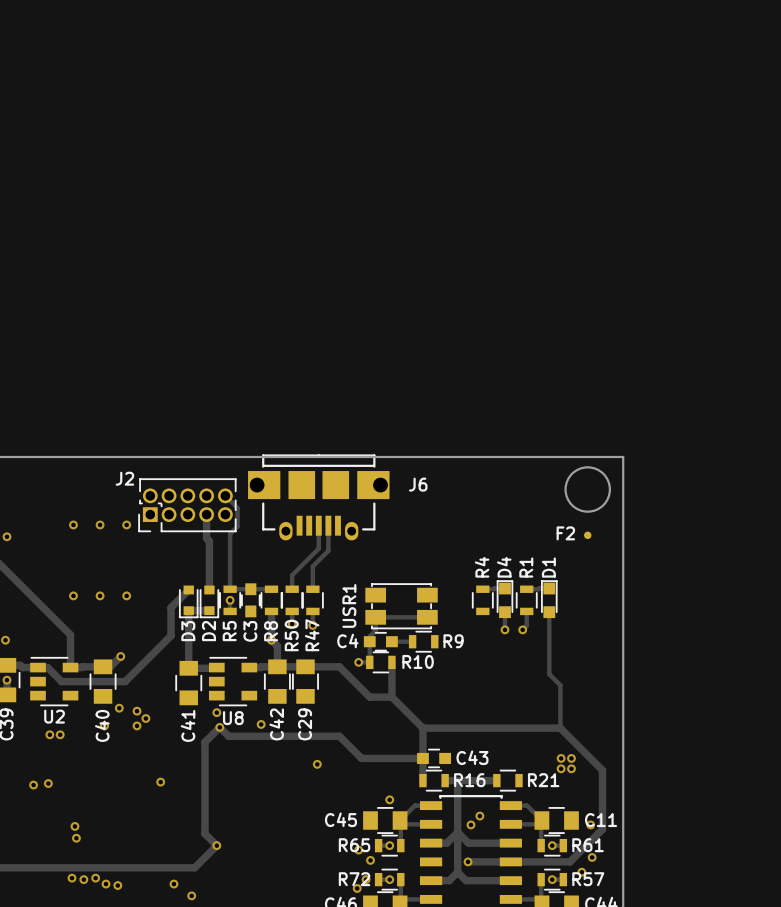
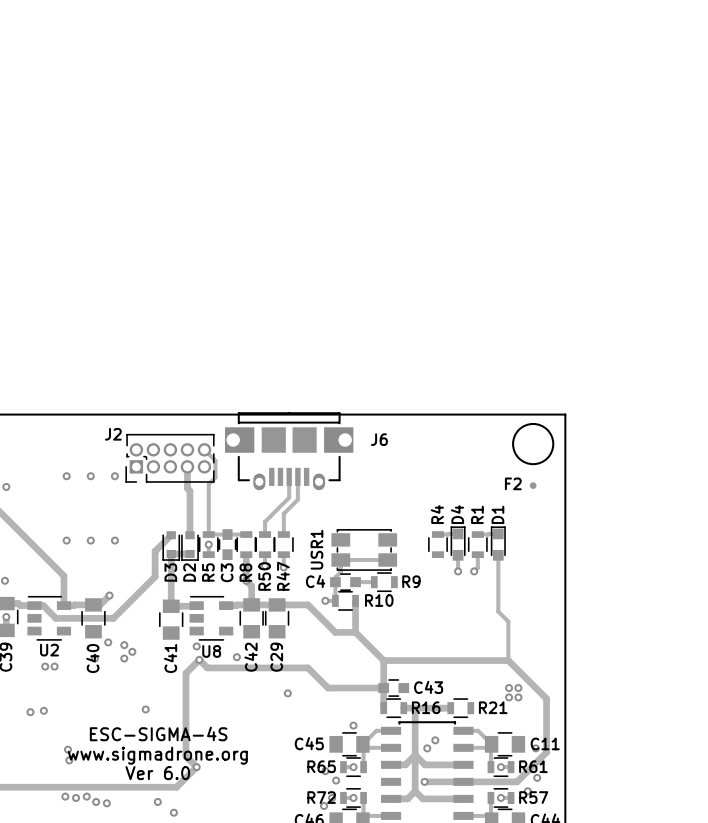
text: none -> ESC-SIGMA-4S (158, 733)
text: none -> www.sigmadrone.org (157, 755)
text: none -> Ver 6.0 (157, 773)

